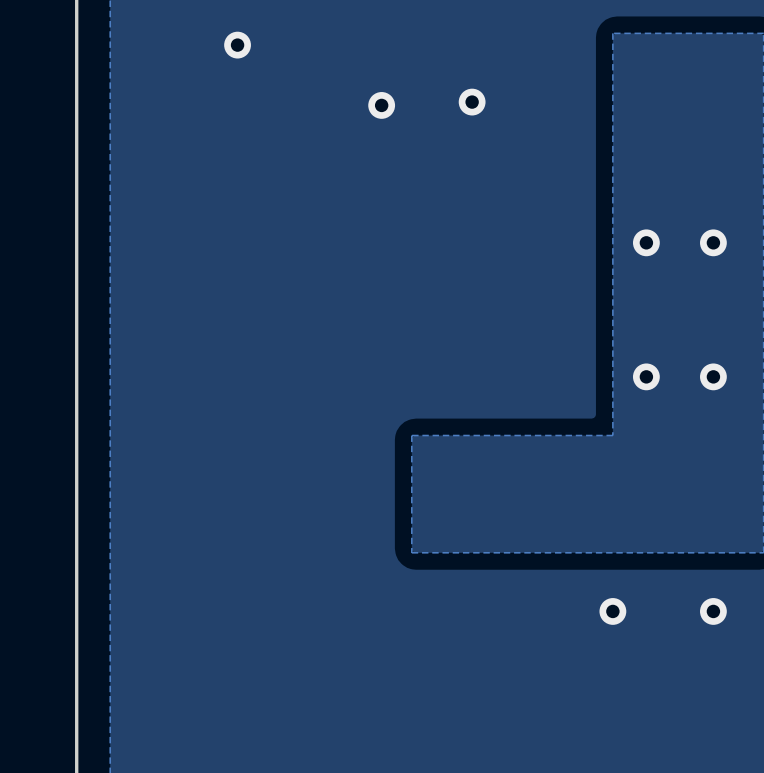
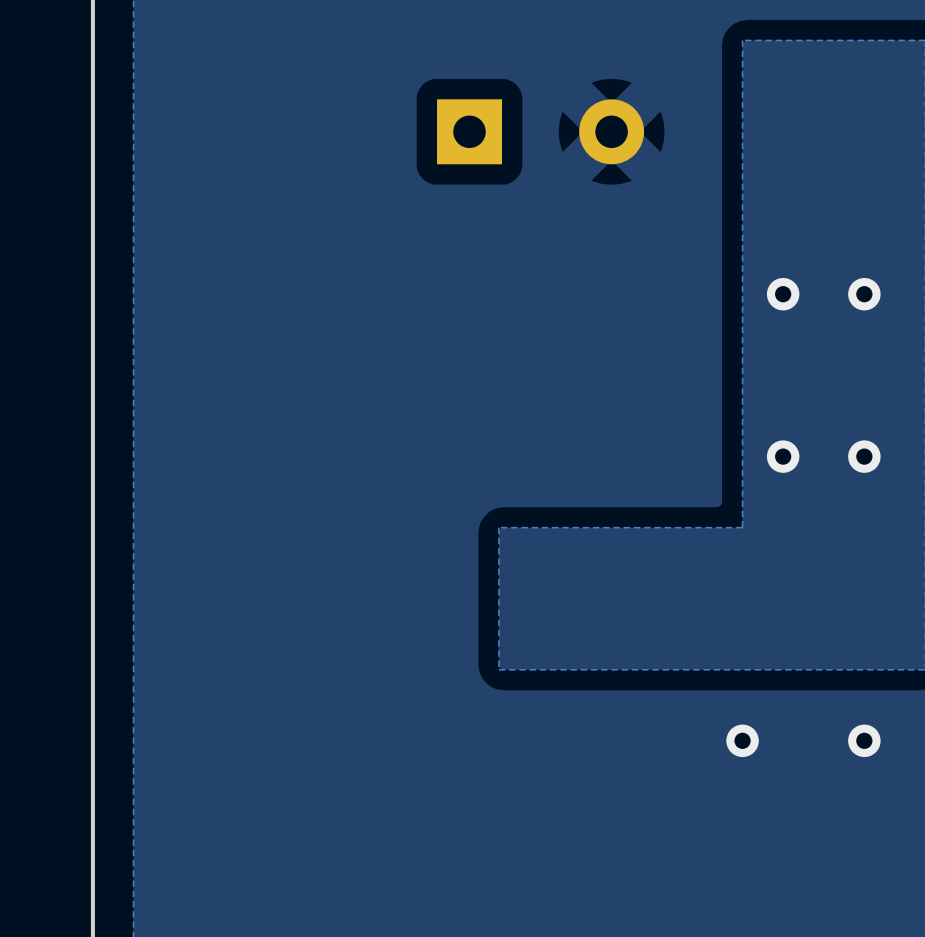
via: (237, 45) -> none
via: (472, 102) -> none
via: (381, 105) -> none
part: none -> (540, 131)

